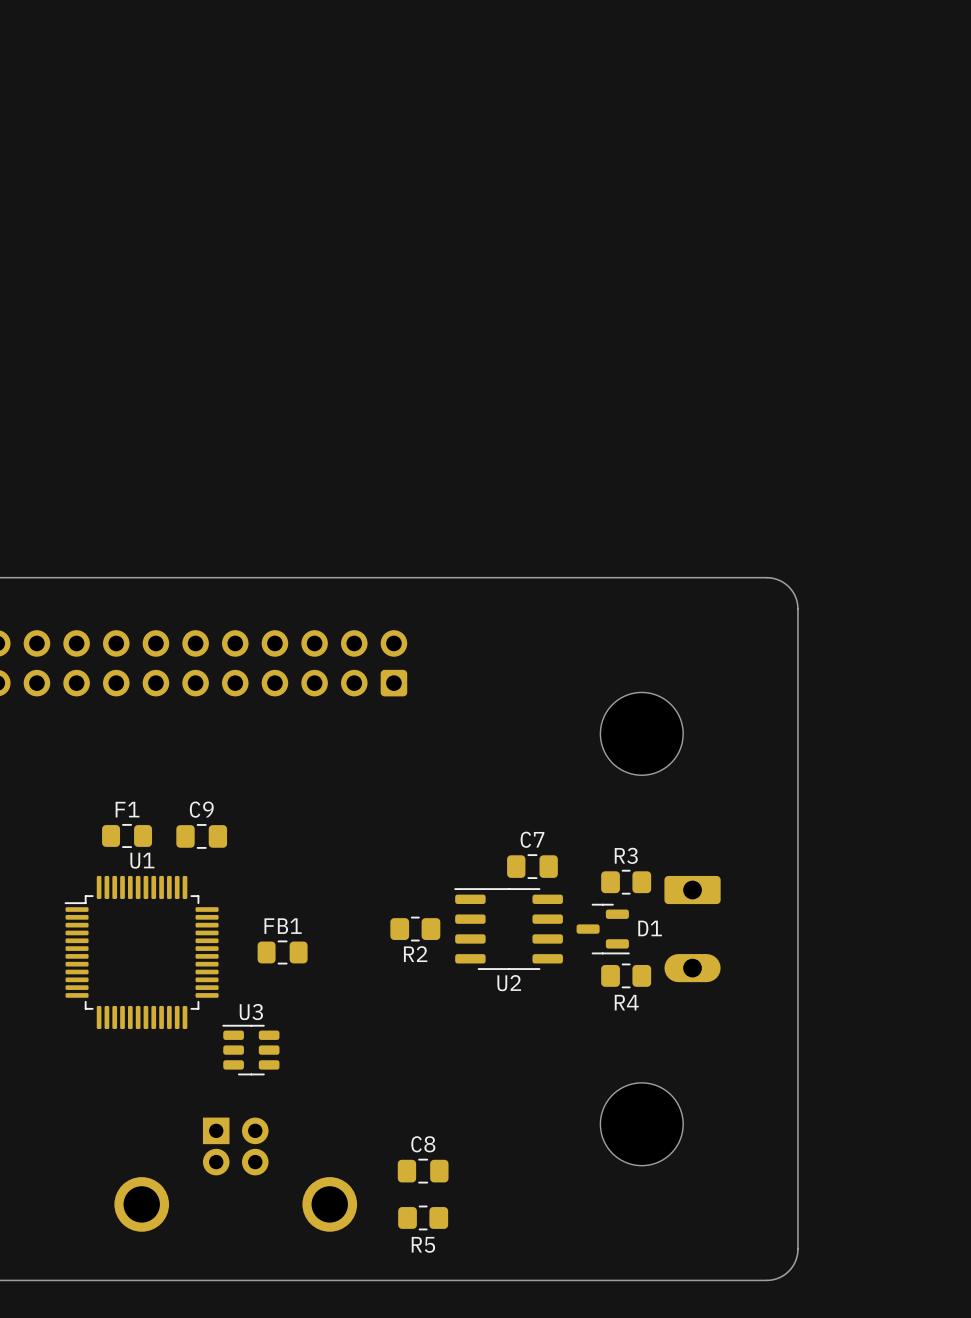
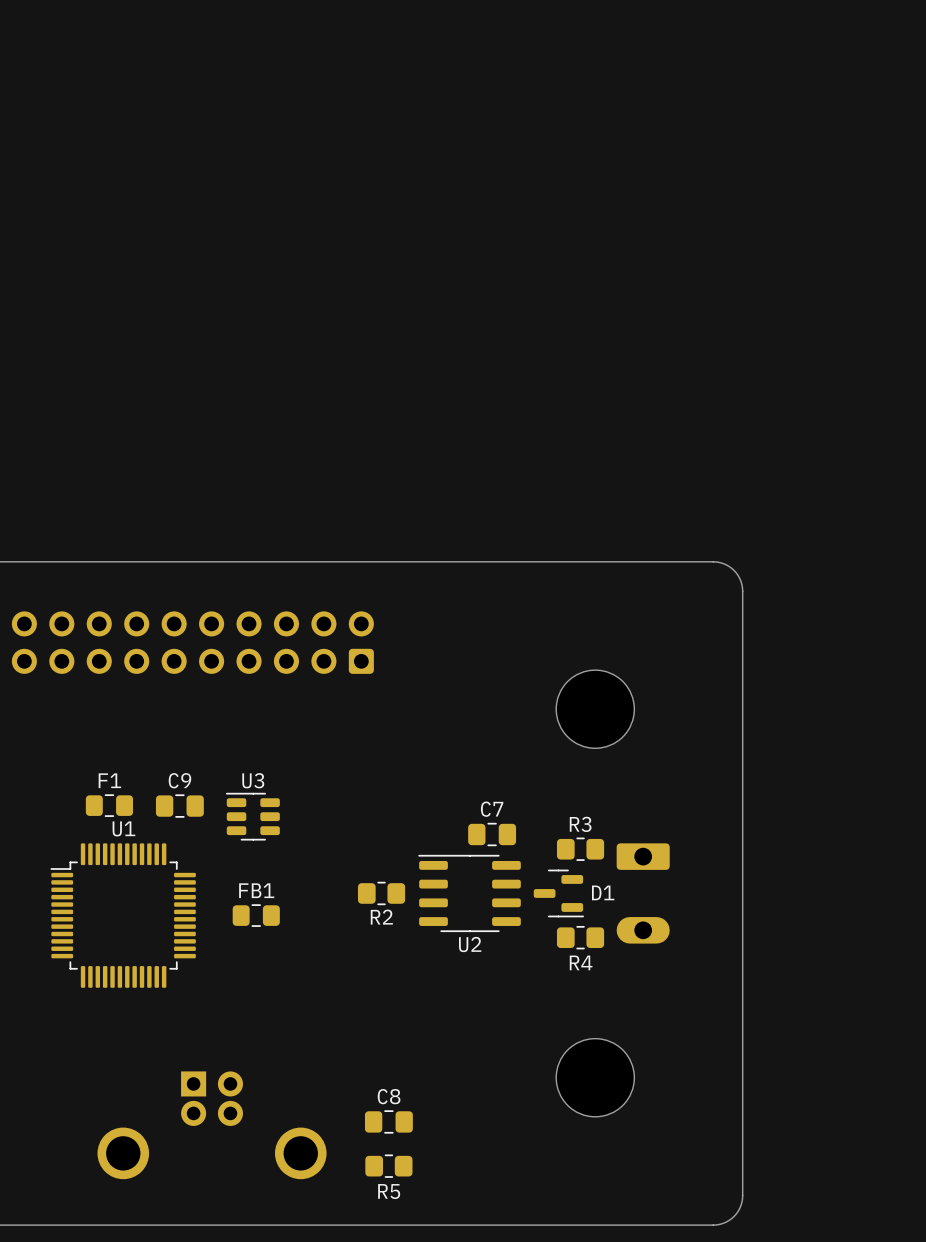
U3 position: (250, 1050) -> (252, 816)

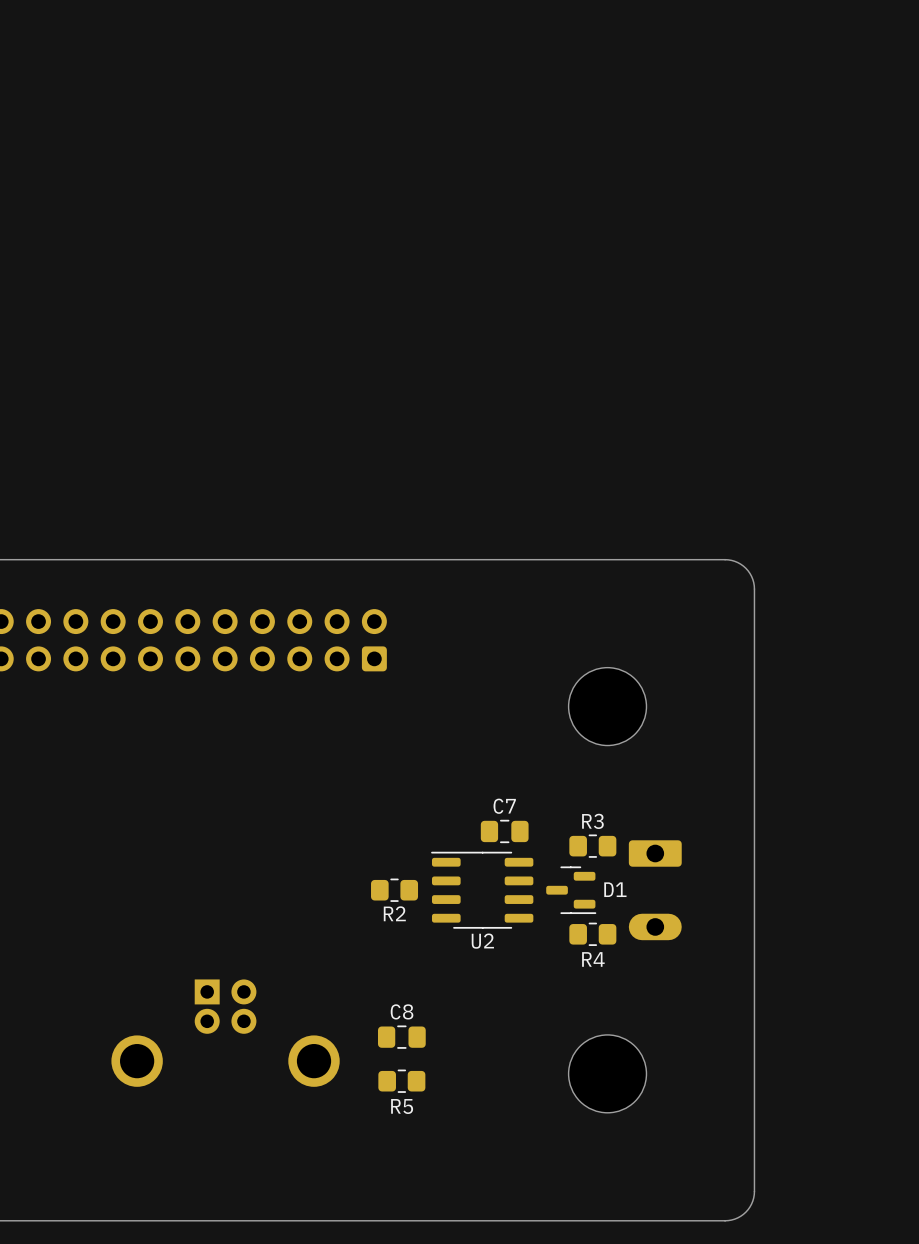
F1: (109, 805) -> none
C9: (179, 806) -> none
U3: (252, 816) -> none
U1: (123, 915) -> none
FB1: (256, 915) -> none
C8 position: (388, 1121) -> (401, 1037)
part position: (212, 1125) -> (225, 1033)
R5 position: (388, 1166) -> (401, 1081)

